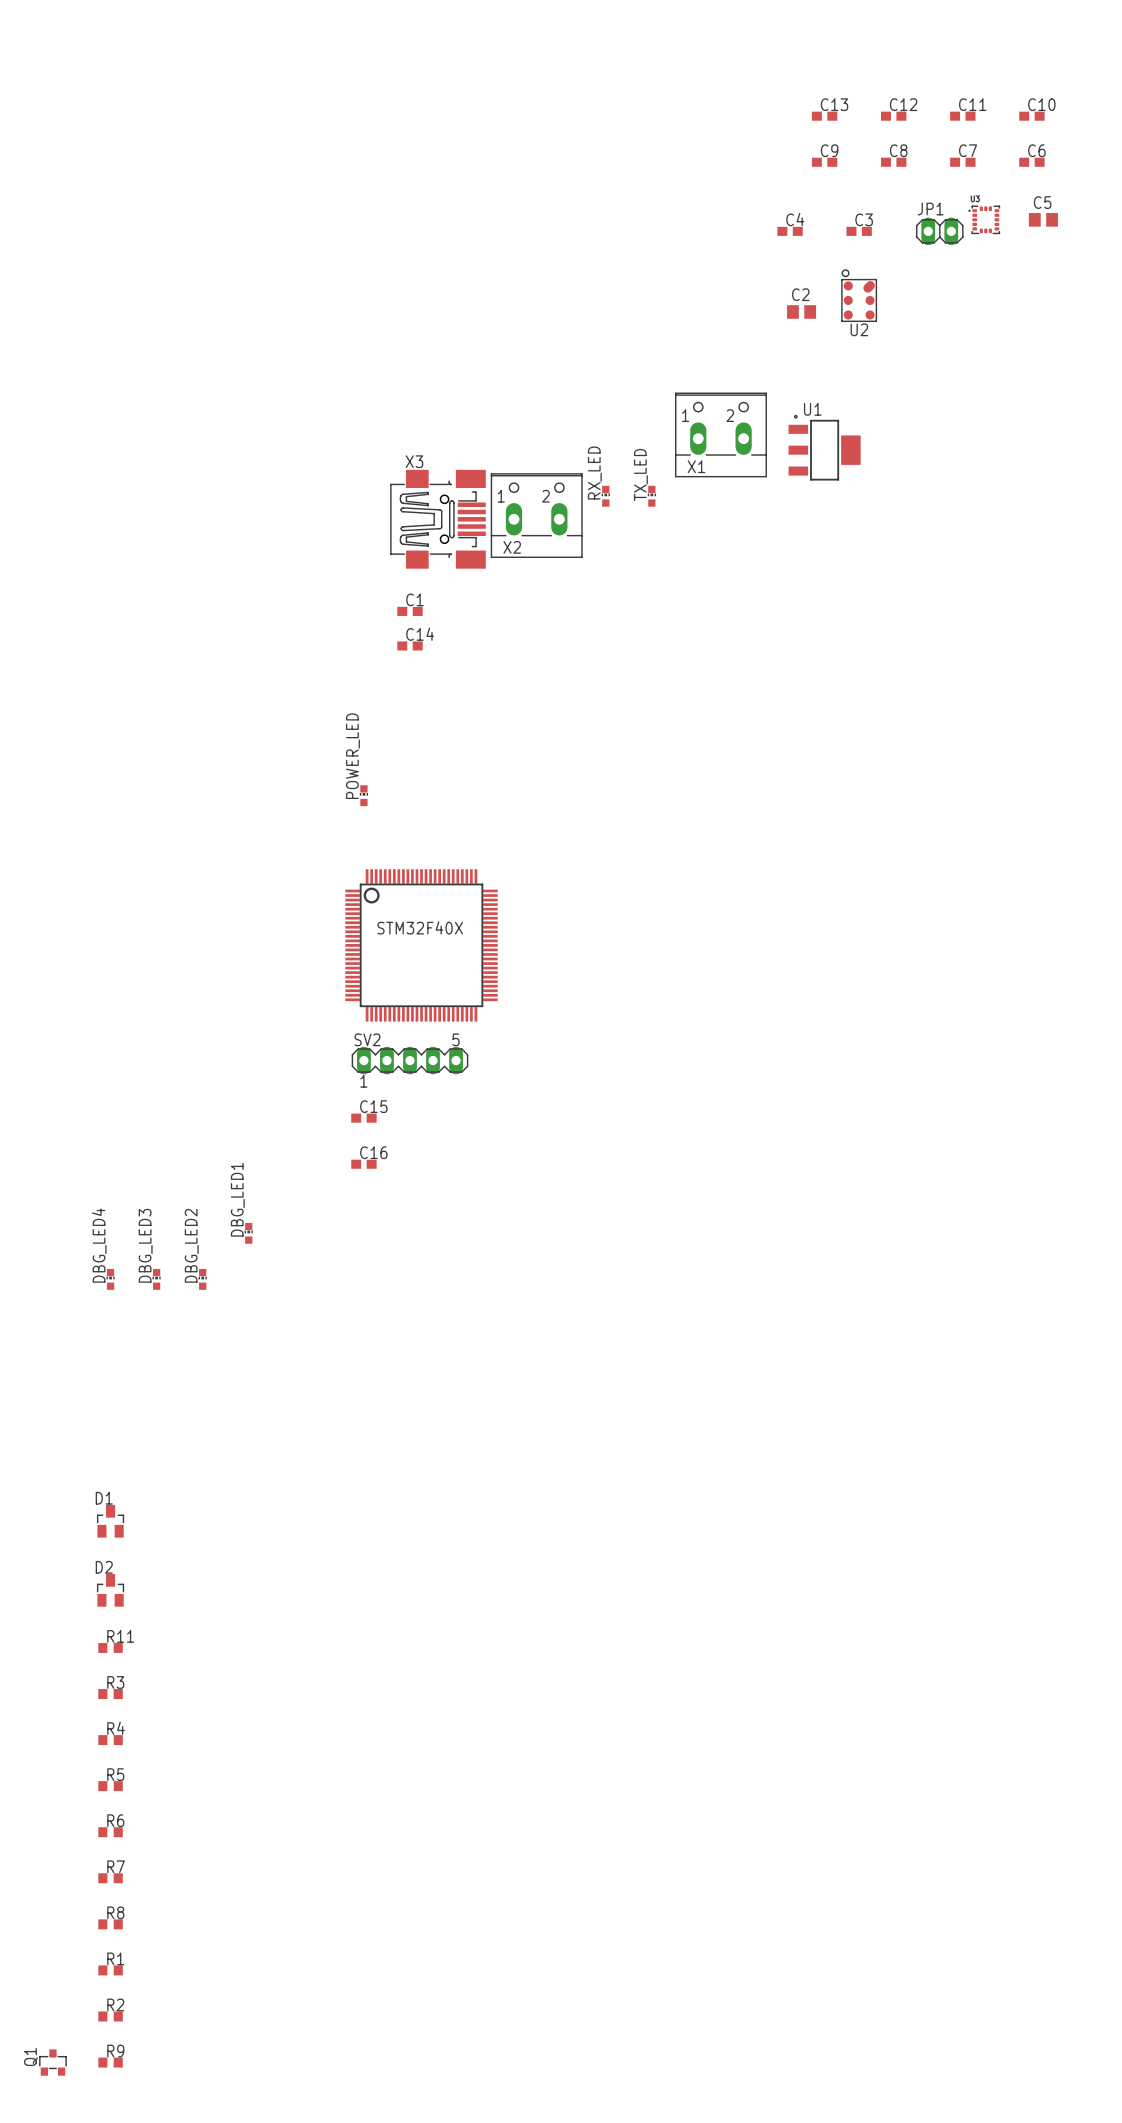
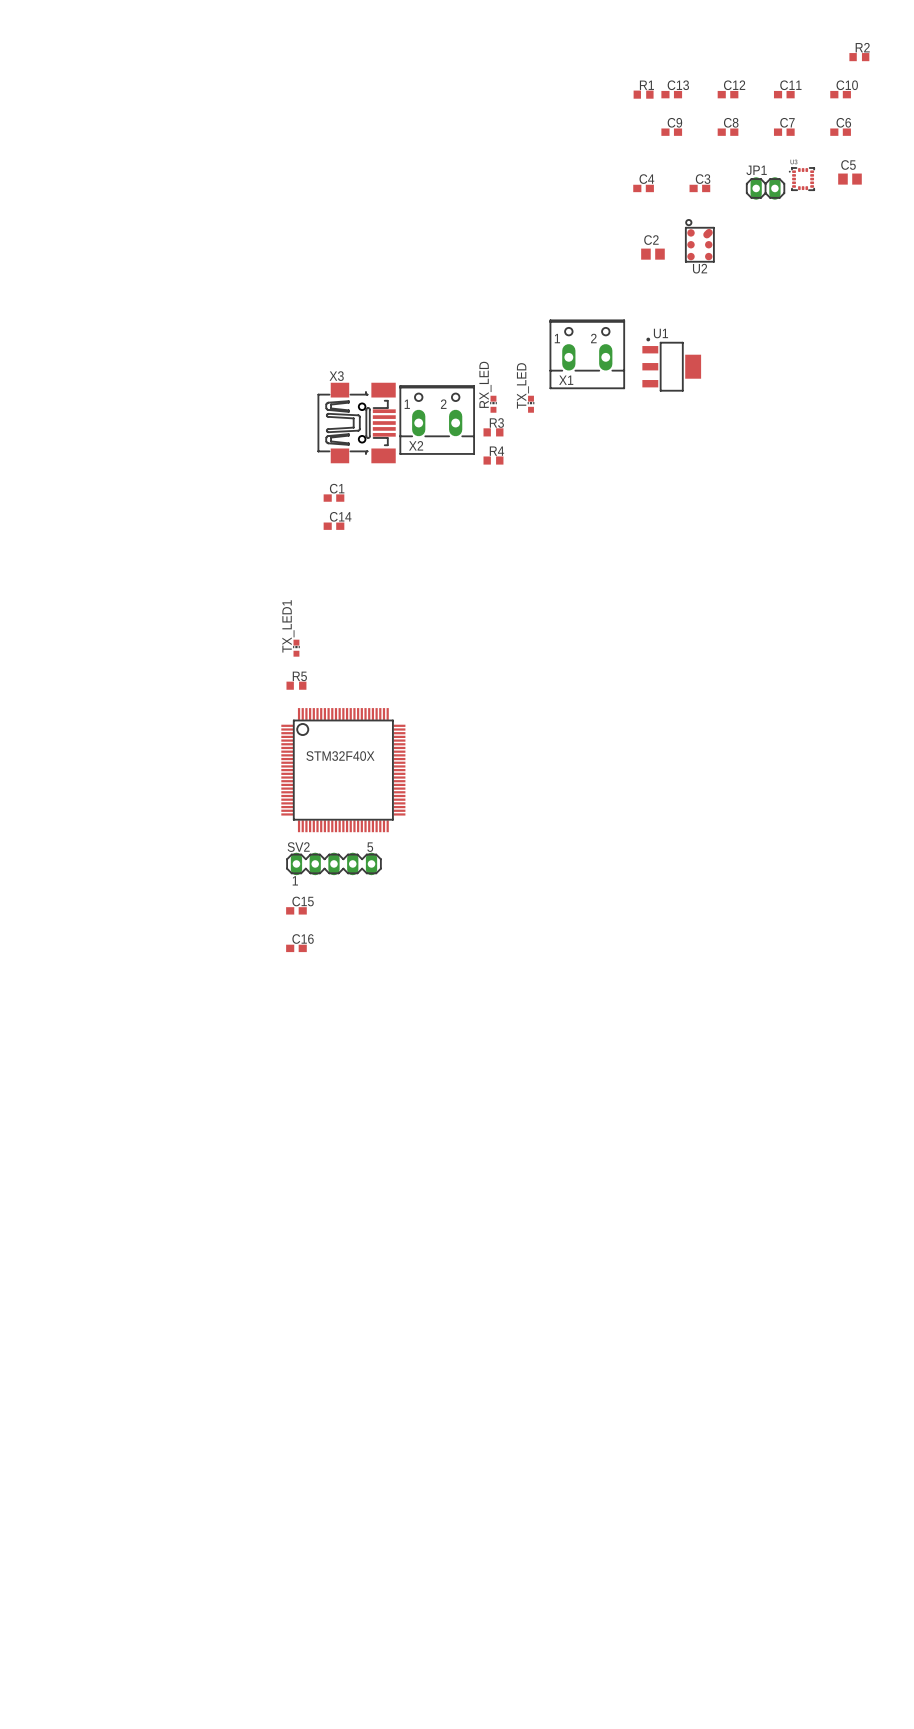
POWER_LED name: POWER_LED (352, 756) -> TX_LED1 (288, 626)
DBG_LED1: (248, 1233) -> none
DBG_LED4: (110, 1279) -> none
DBG_LED3: (156, 1279) -> none
DBG_LED2: (202, 1279) -> none
D1: (110, 1521) -> none
D2: (110, 1590) -> none
R11: (110, 1647) -> none
R3 position: (110, 1694) -> (493, 432)
R4 position: (110, 1740) -> (493, 460)
R5 position: (110, 1786) -> (296, 685)
R6: (110, 1832) -> none
R7: (110, 1878) -> none
R8: (110, 1924) -> none
R1 position: (110, 1970) -> (643, 94)
R2 position: (110, 2016) -> (859, 57)
Q1: (52, 2062) -> none
R9: (110, 2062) -> none

